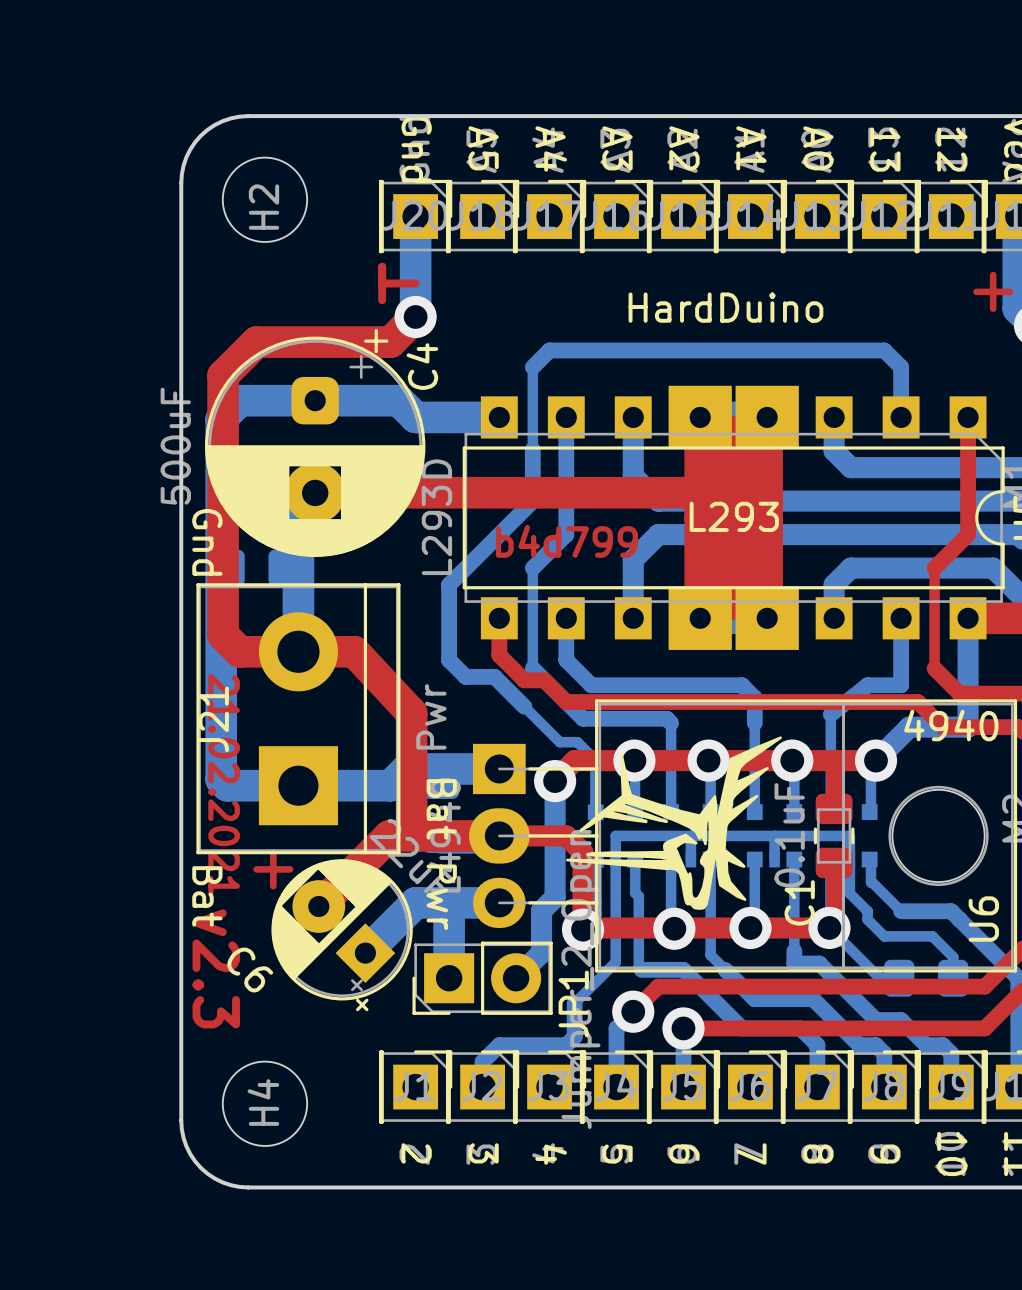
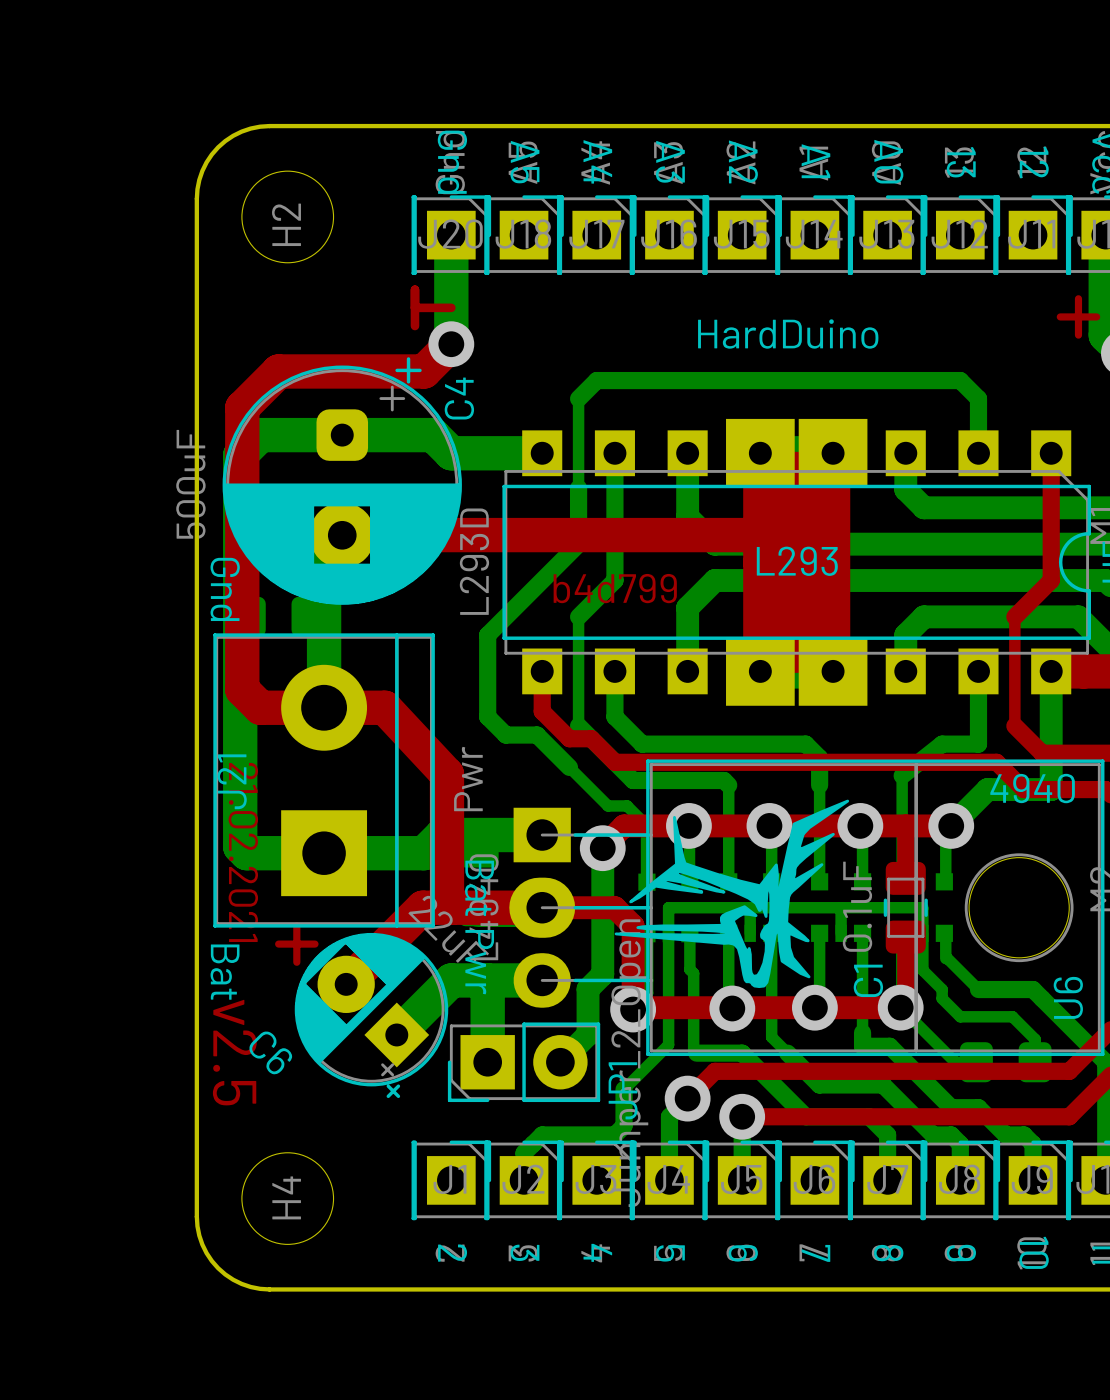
text: v2.3 (216, 968) -> v2.5 (234, 1052)

